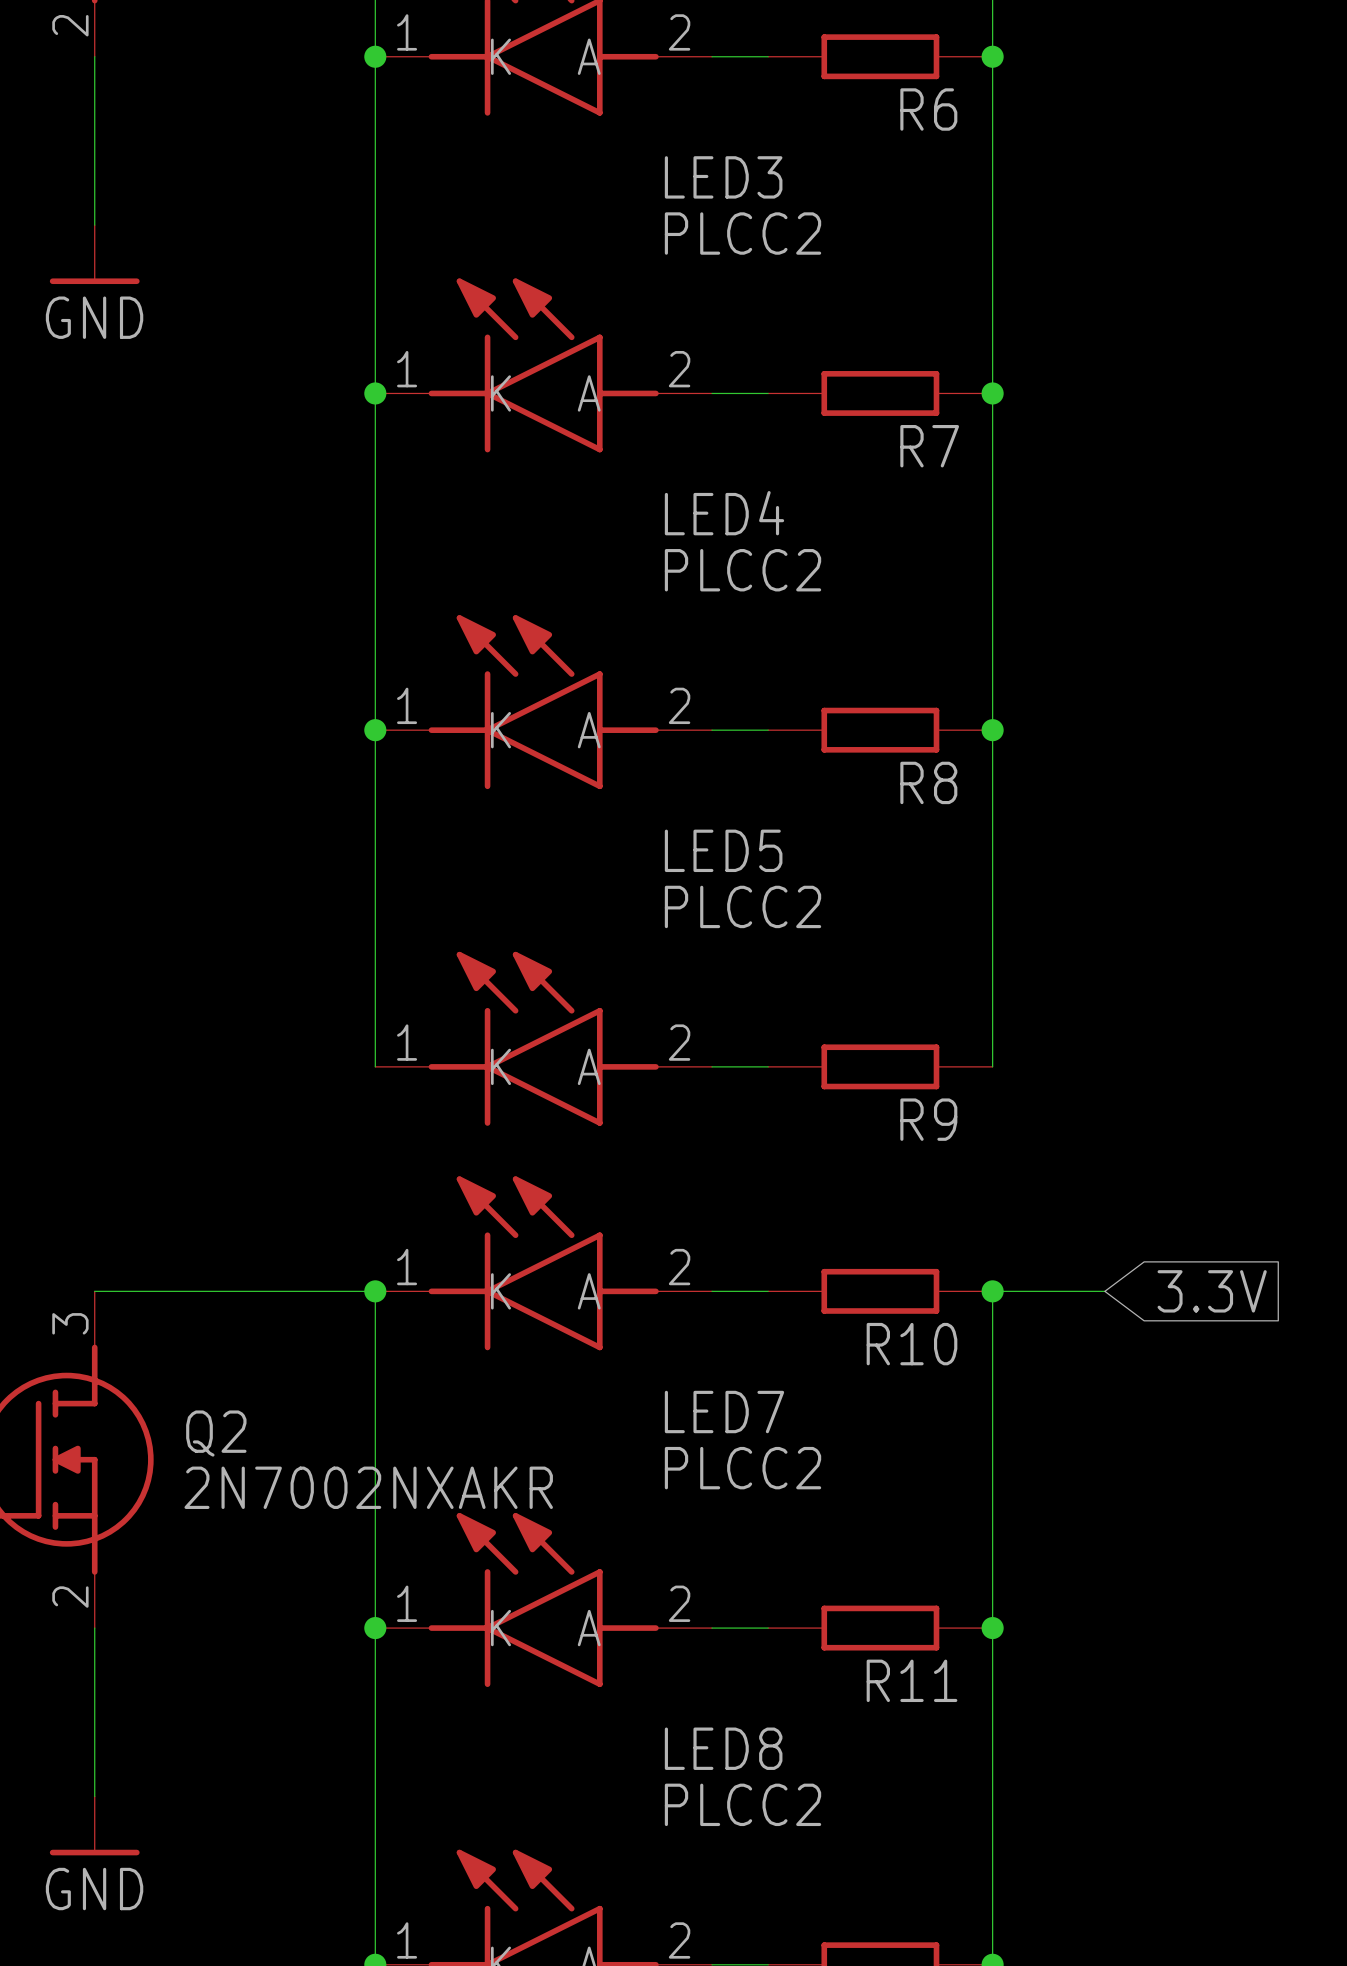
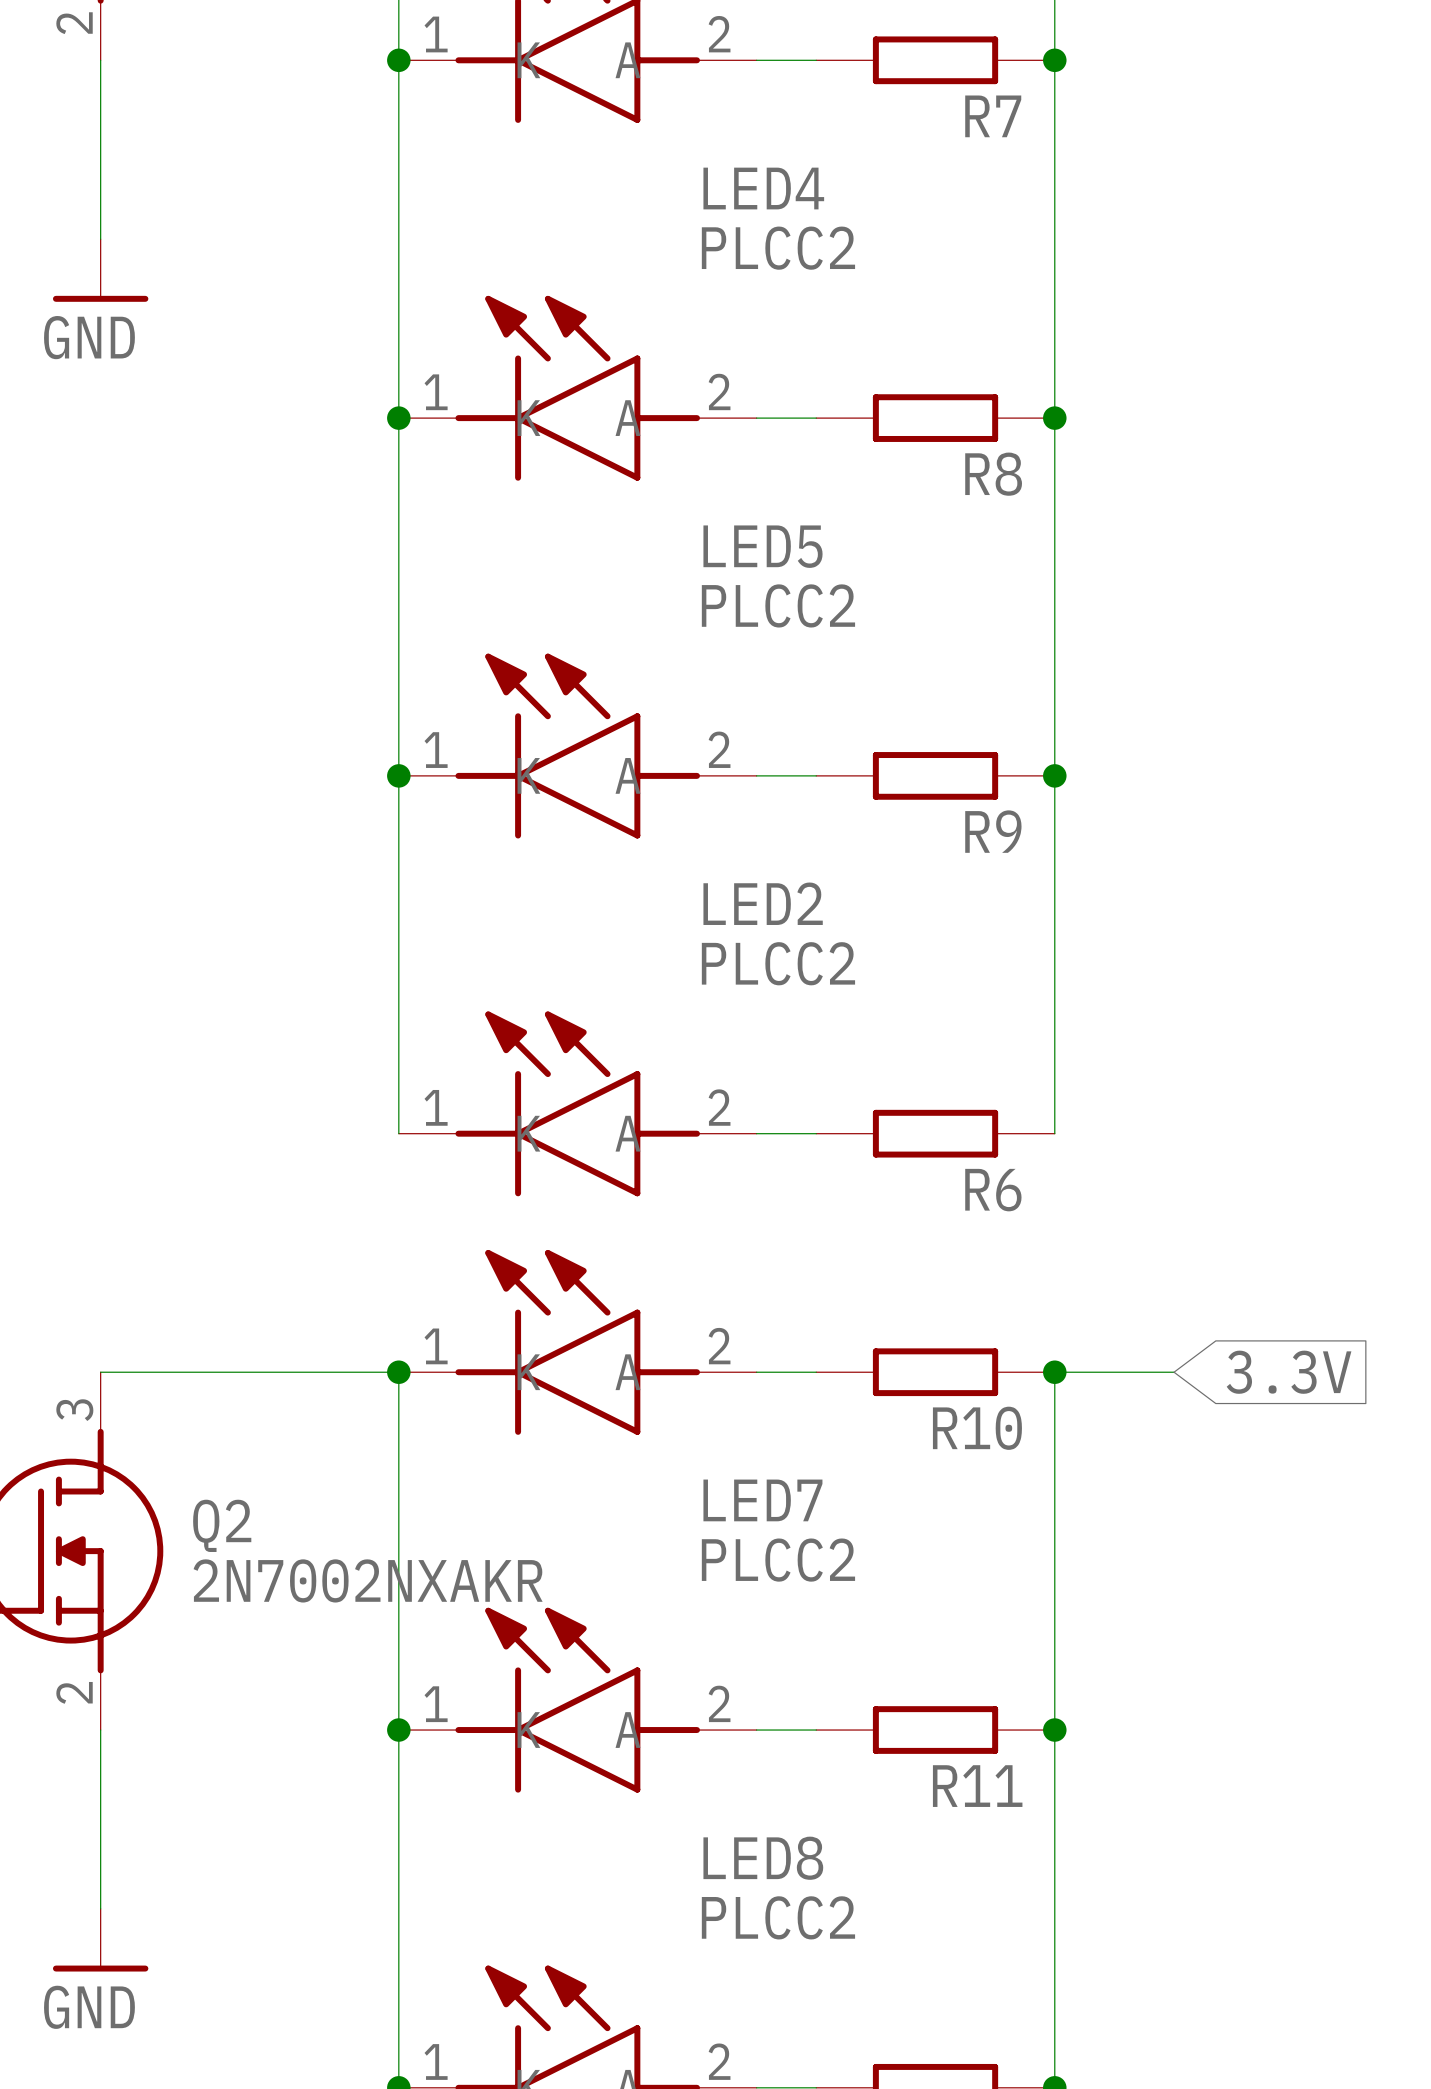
R6 name: R6 (928, 109) -> R7 (993, 116)
LED3 name: LED3 (723, 177) -> LED4 (763, 188)
R7 name: R7 (929, 446) -> R8 (993, 474)
LED4 name: LED4 (724, 513) -> LED5 (763, 546)
R8 name: R8 (928, 782) -> R9 (993, 831)
LED5 name: LED5 (723, 850) -> LED2 (763, 903)
R9 name: R9 (928, 1119) -> R6 (993, 1190)

